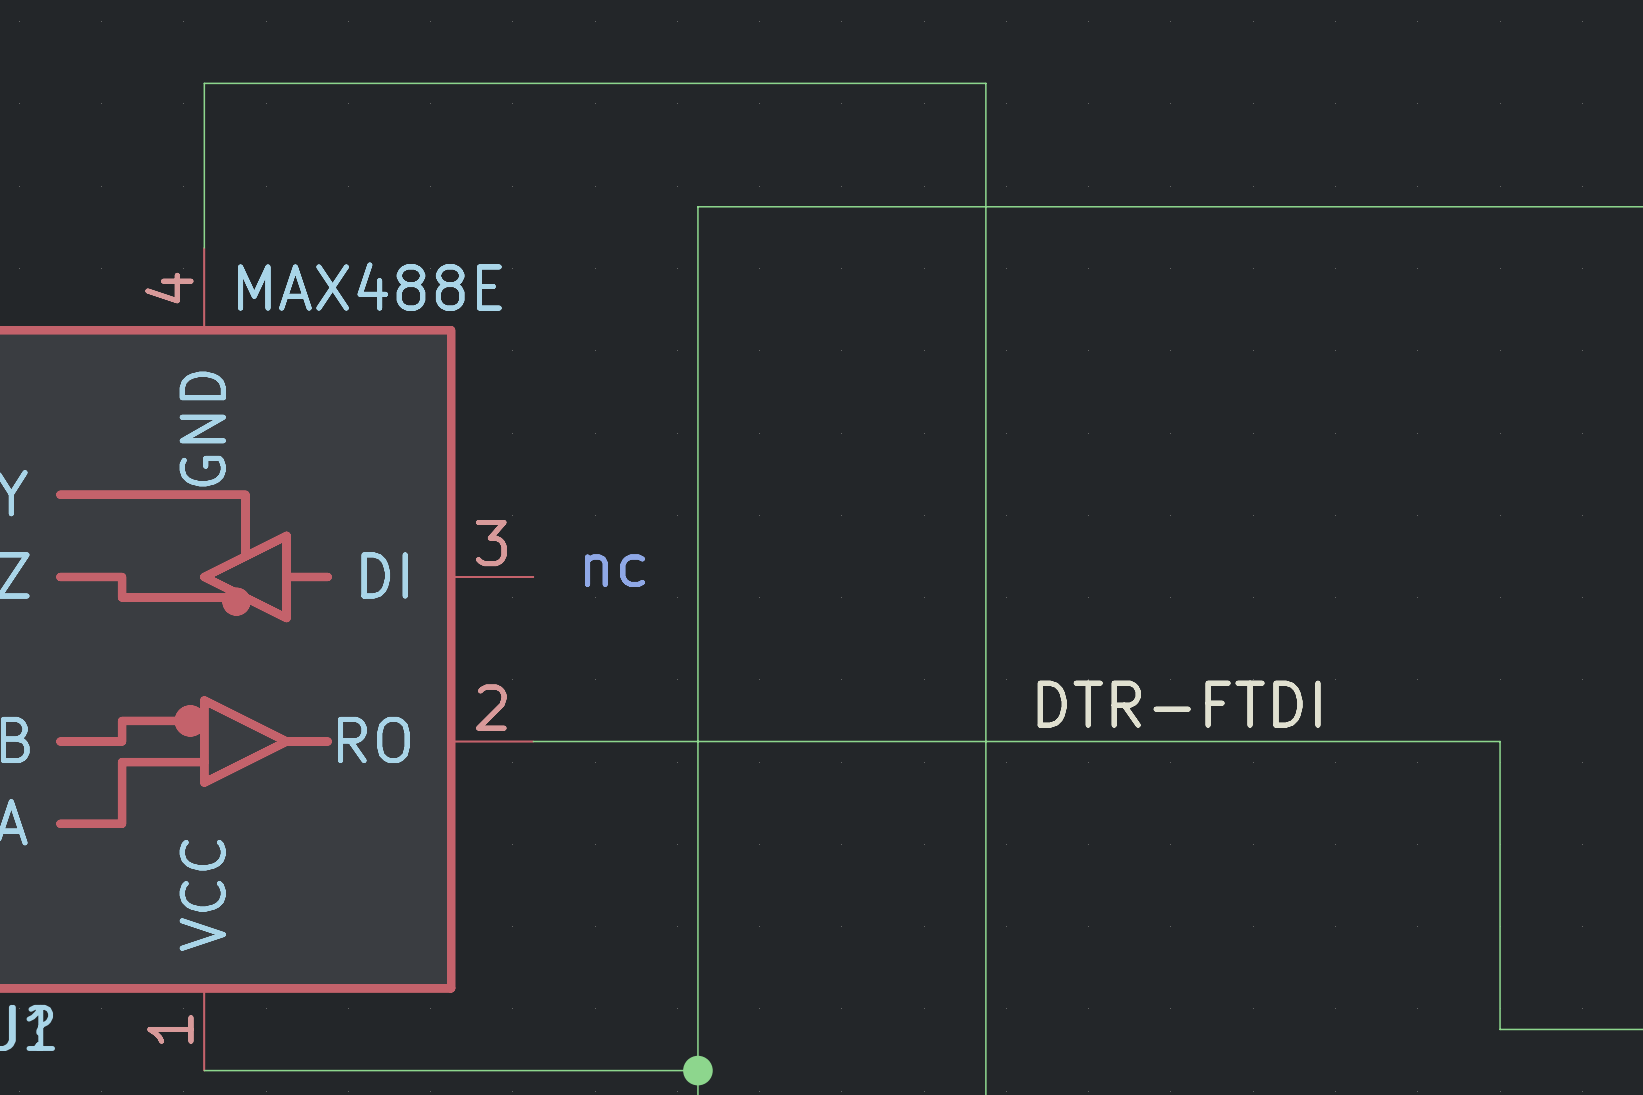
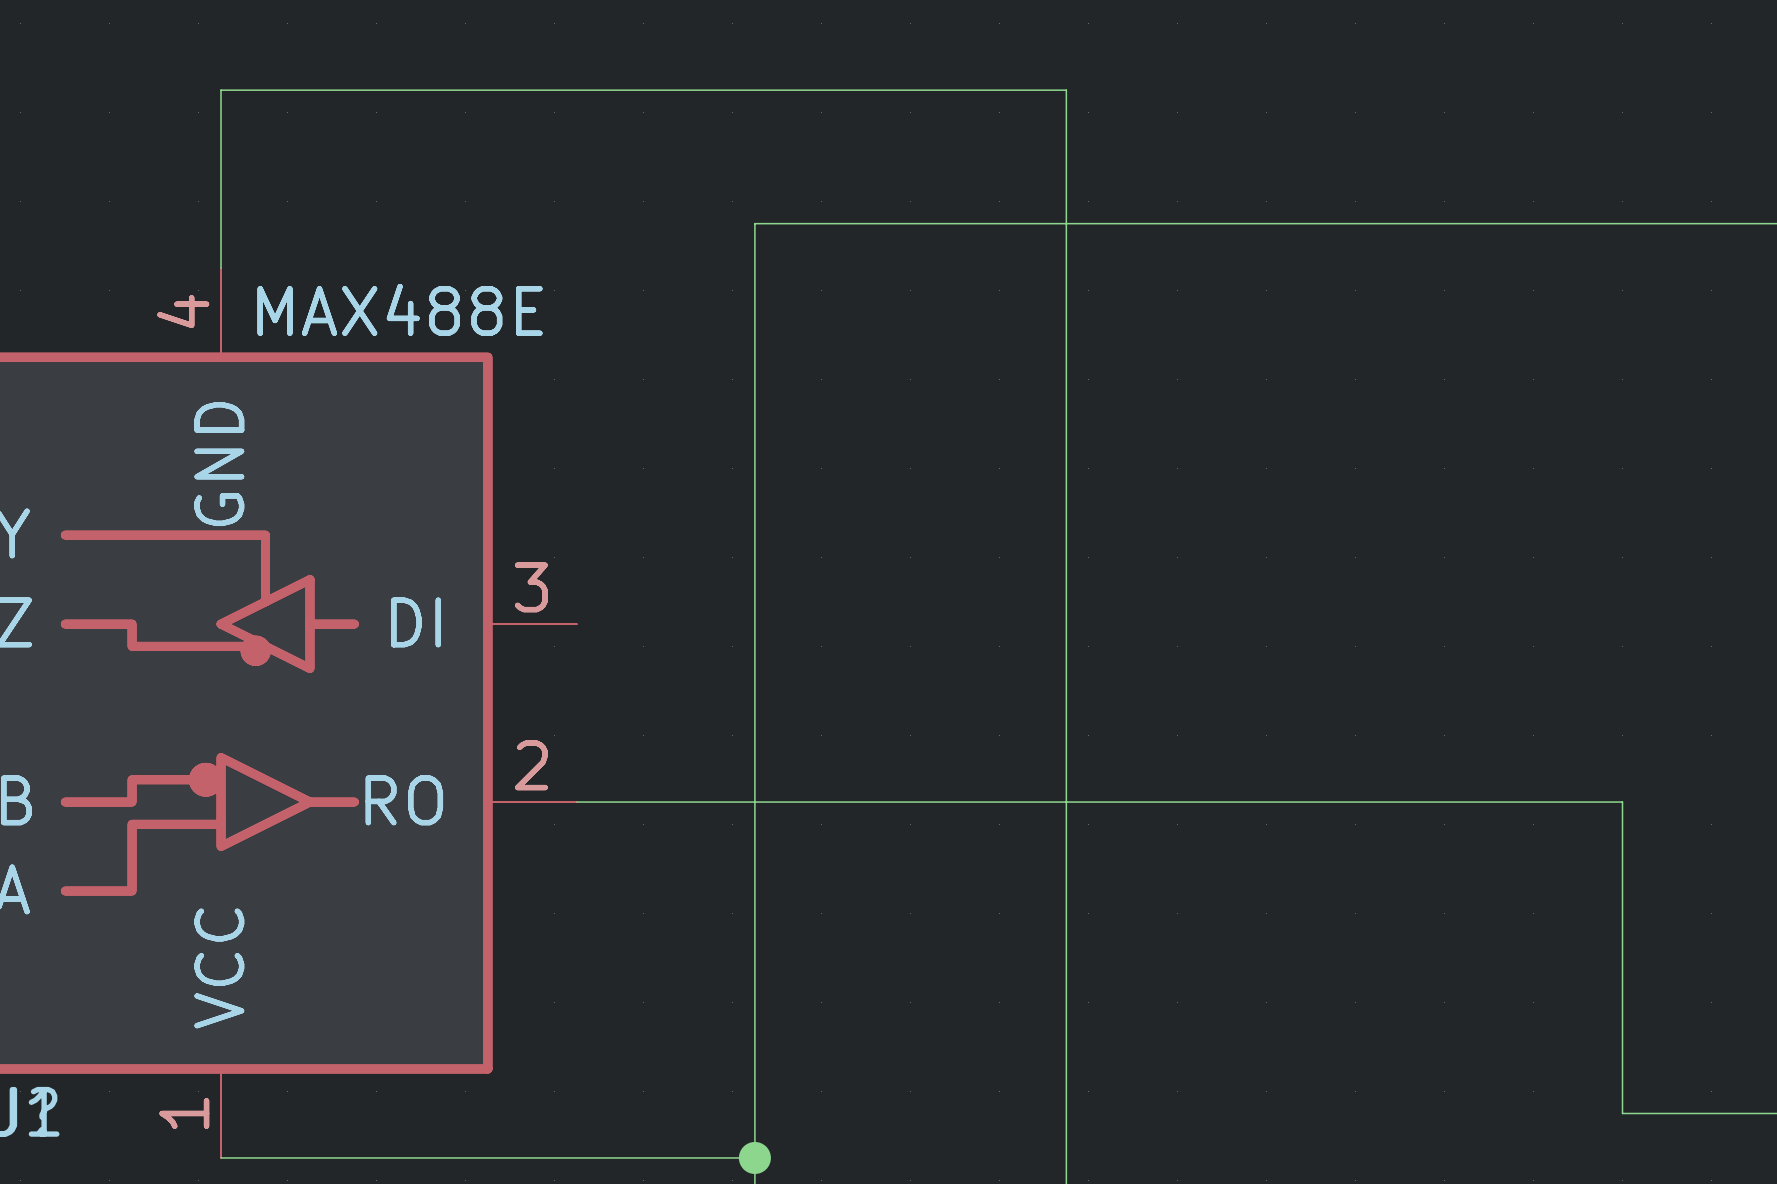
text: nc (615, 570) -> none
label: DTR-FTDI (1179, 704) -> none

